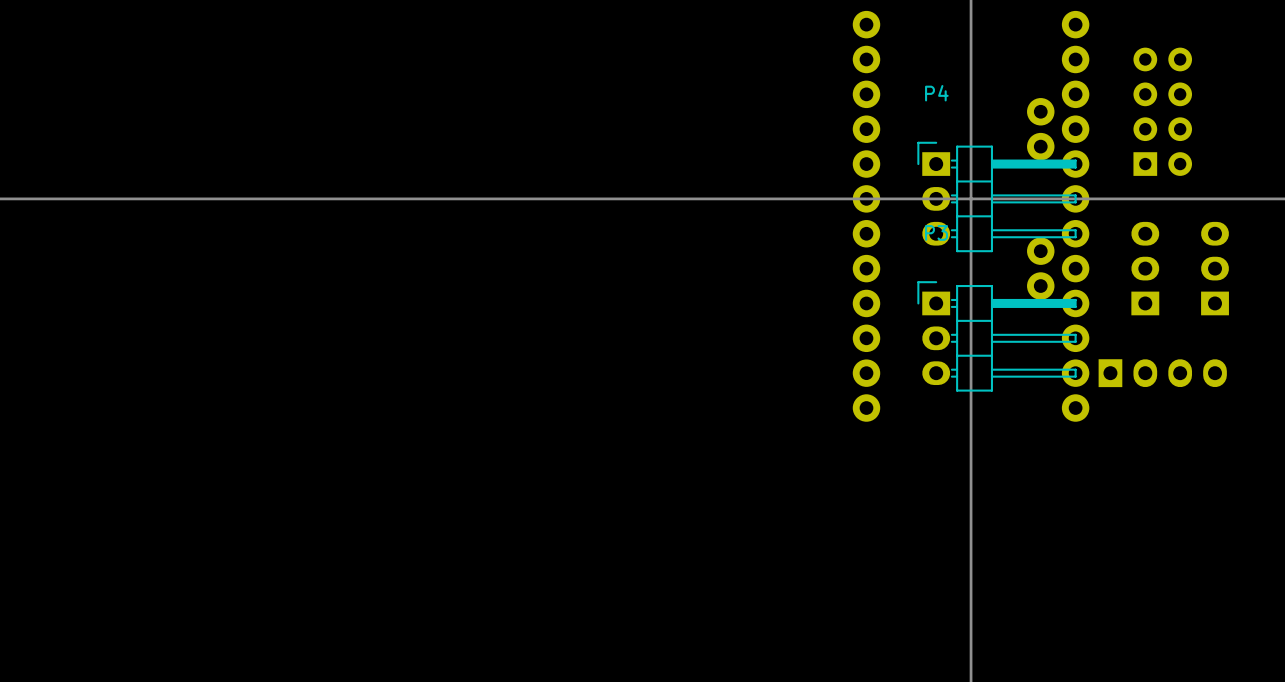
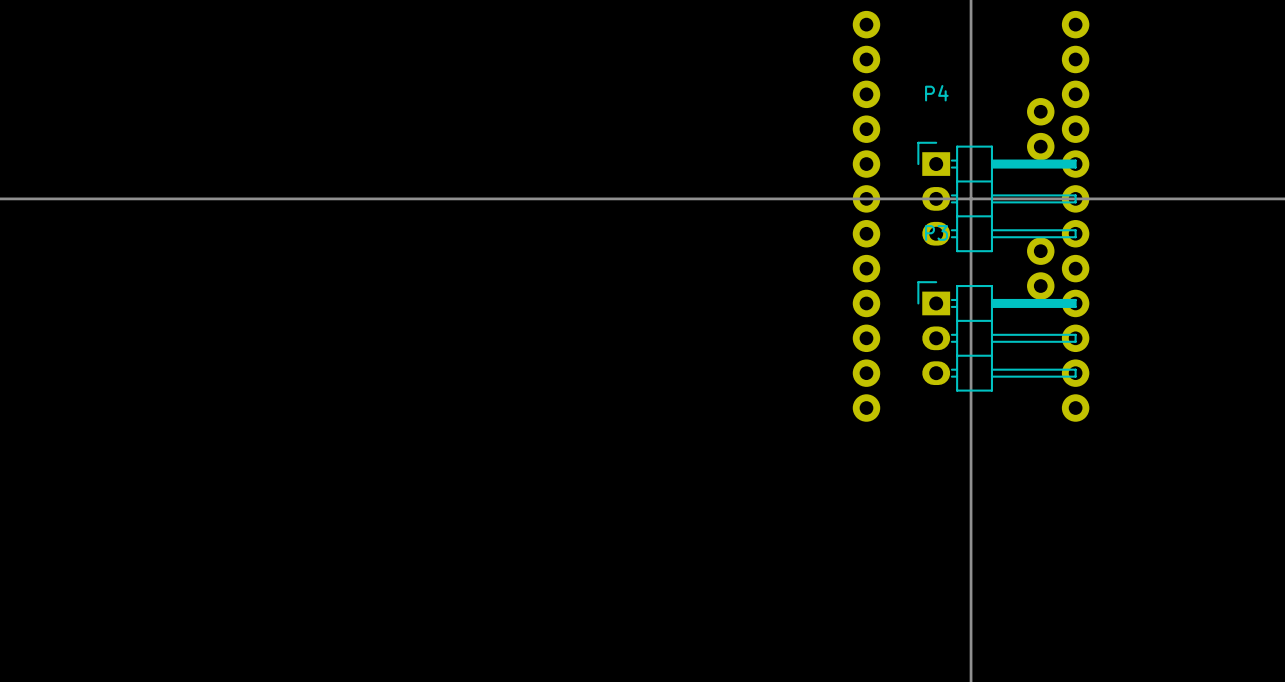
part: (1162, 111) -> none
part: (1145, 268) -> none
part: (1215, 268) -> none
part: (1162, 373) -> none

